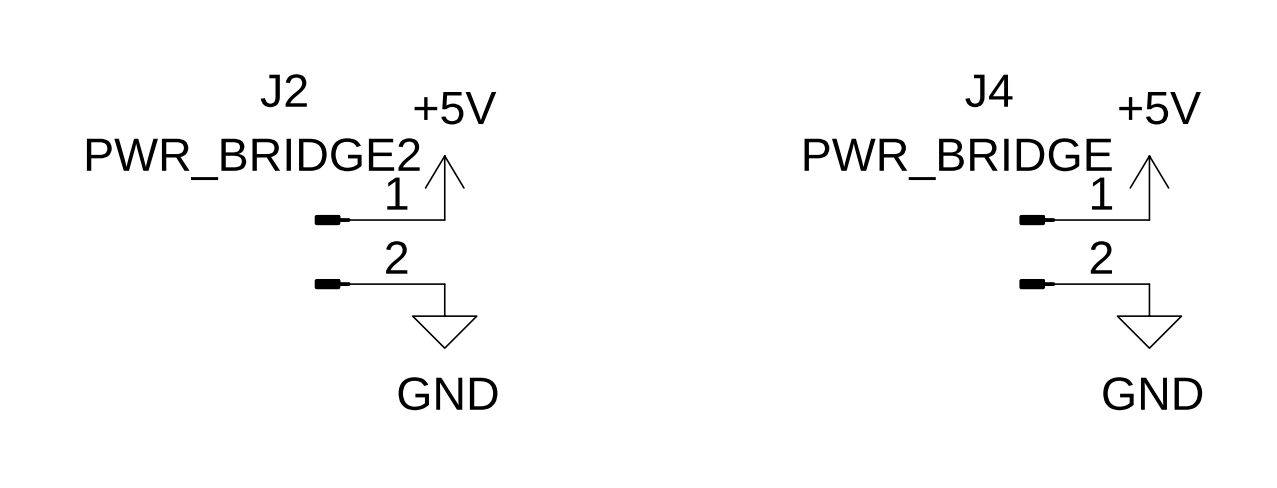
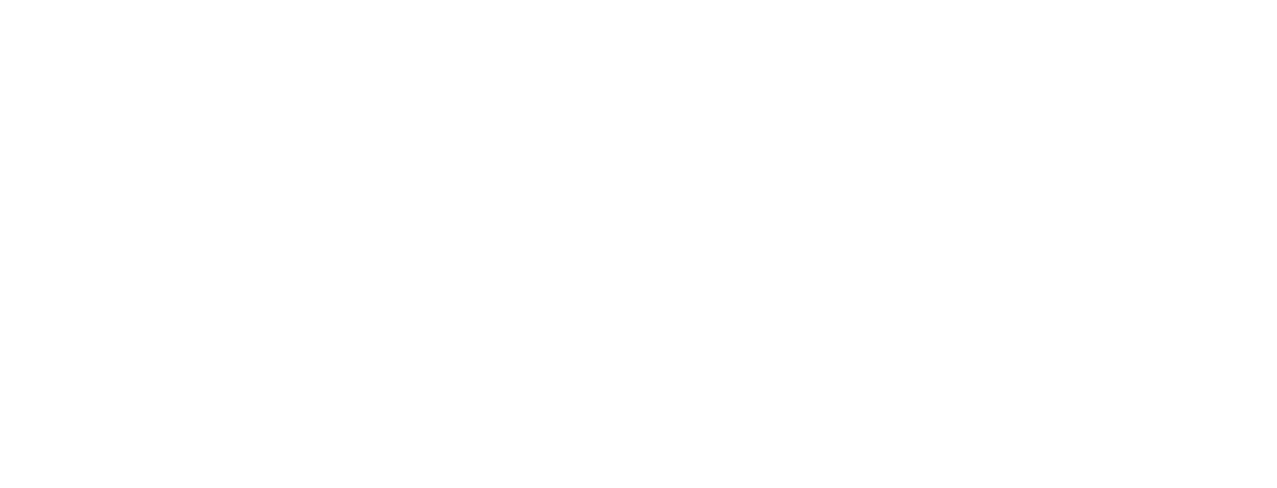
power symbol: +5V (444, 188) -> none
power symbol: +5V (1149, 188) -> none
J2: PWR_BRIDGE2 (379, 252) -> none
J4: PWR_BRIDGE (1084, 252) -> none
power symbol: GND (444, 316) -> none
power symbol: GND (1149, 316) -> none

